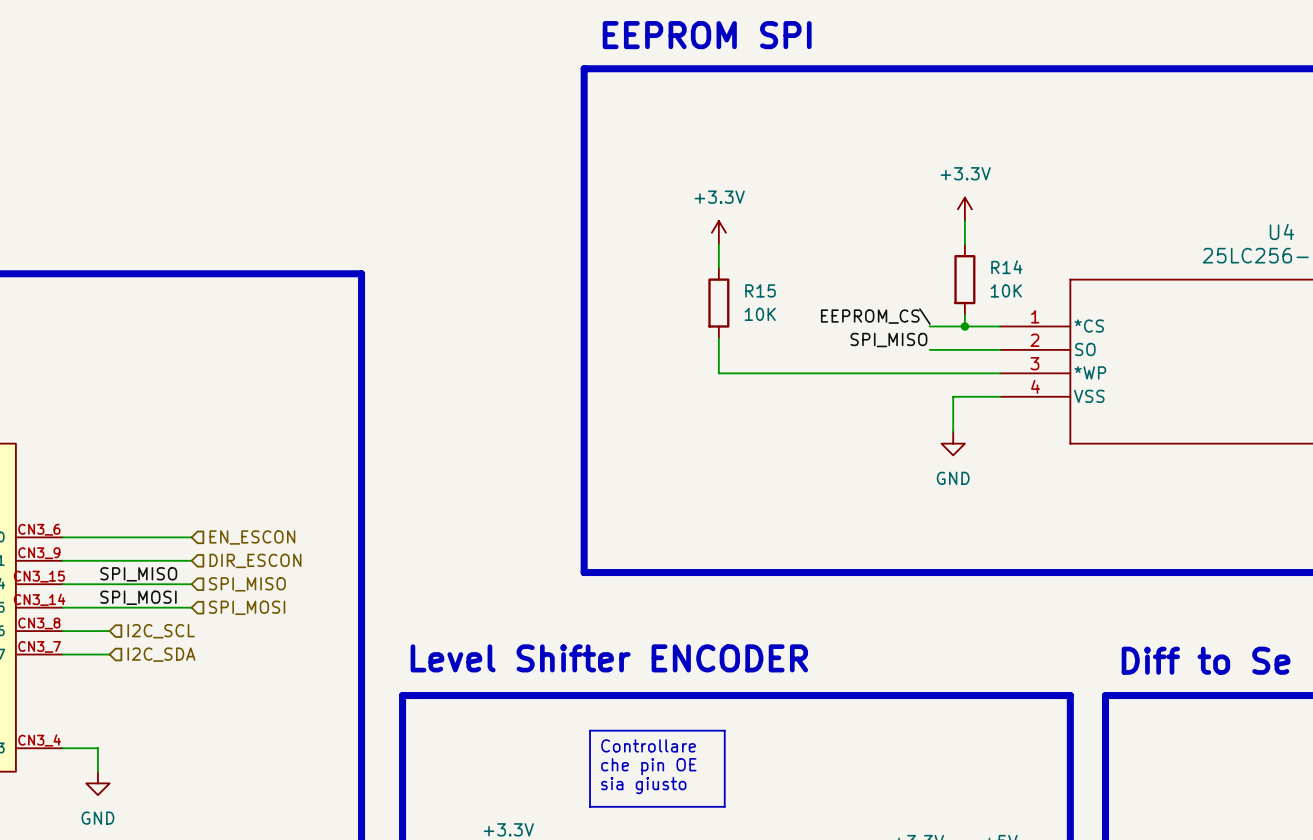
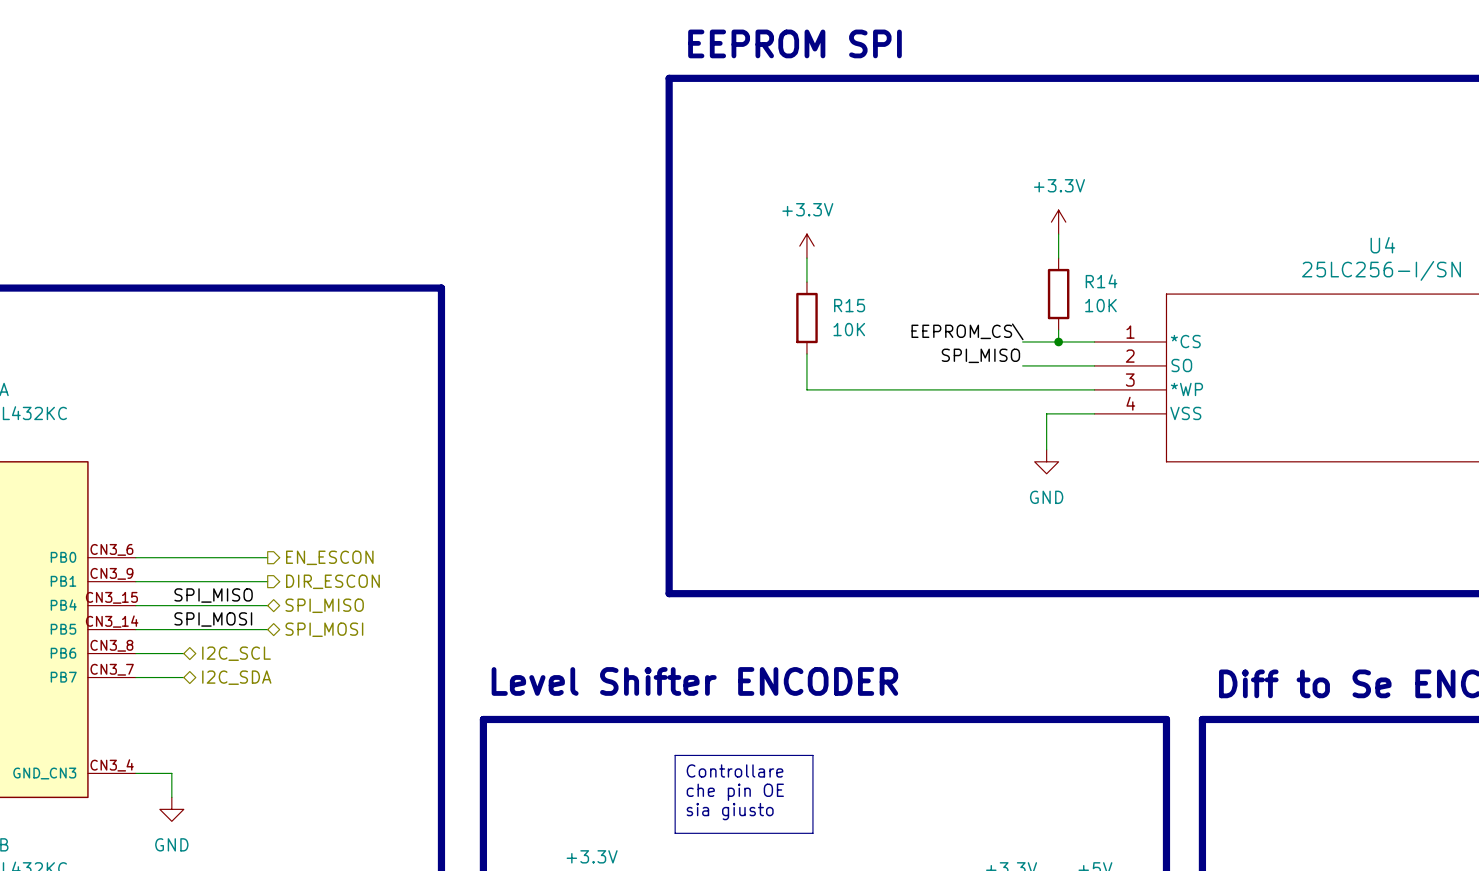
hierarchical label shape: input (252, 537) -> output (329, 557)
hierarchical label shape: input (255, 560) -> output (332, 581)
hierarchical label shape: input (247, 584) -> bidirectional (324, 605)
hierarchical label shape: input (247, 607) -> bidirectional (324, 629)
hierarchical label shape: input (161, 631) -> bidirectional (236, 653)
hierarchical label shape: input (161, 654) -> bidirectional (236, 677)

